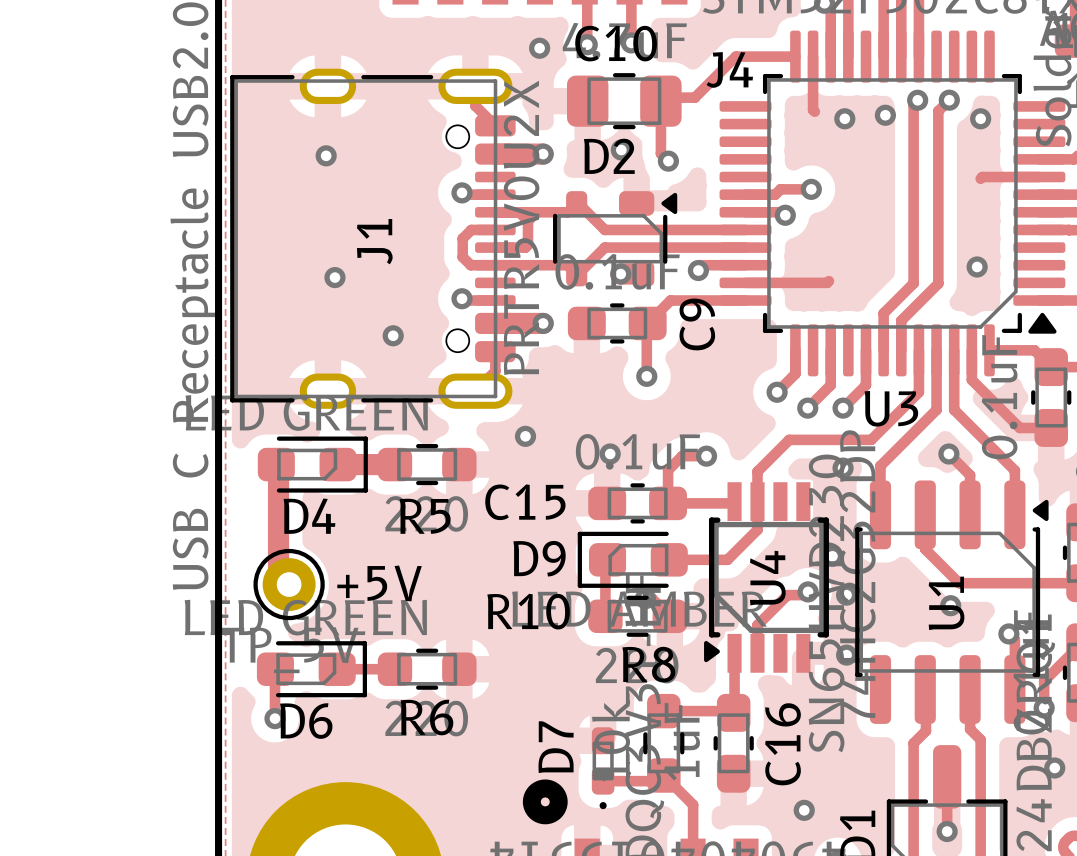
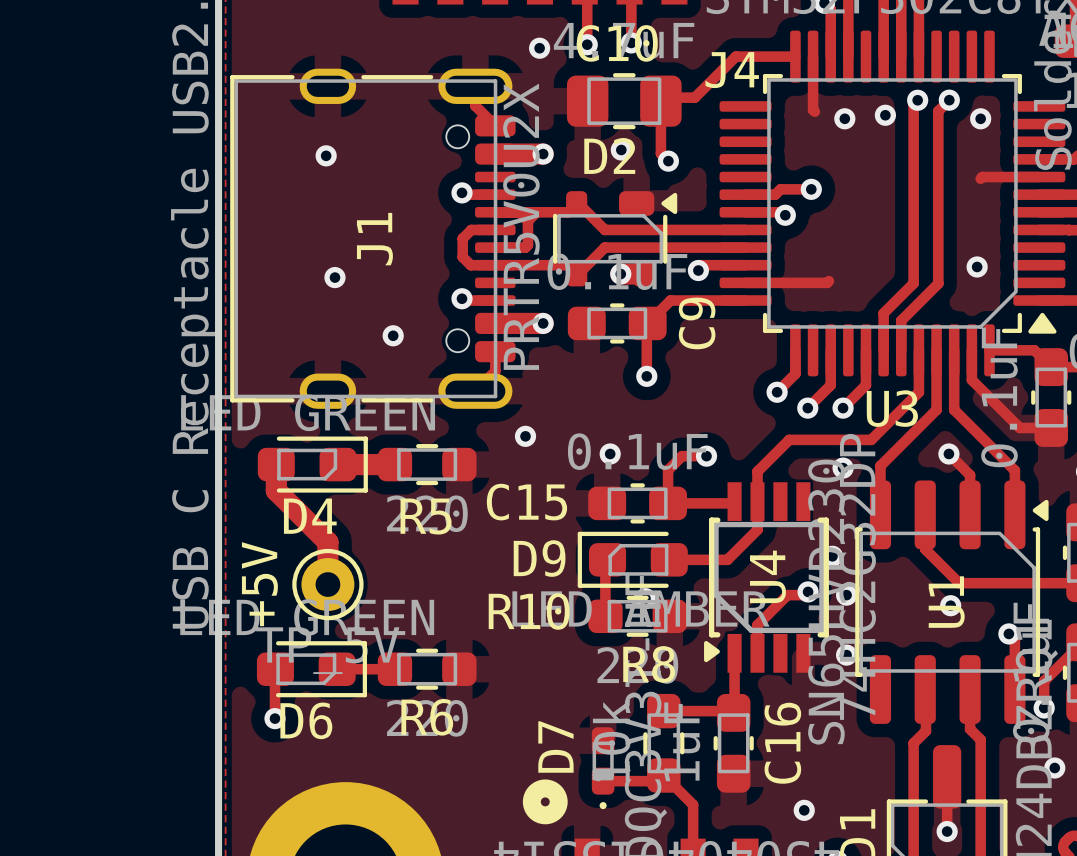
track: (276, 464) (278, 466) (278, 573) (289, 584) -> (276, 464) (276, 490) (327, 542) (327, 584)
+5V name rotation: 0° (379, 583) -> 90° counterclockwise (259, 584)
+5V position: (289, 584) -> (327, 584)

